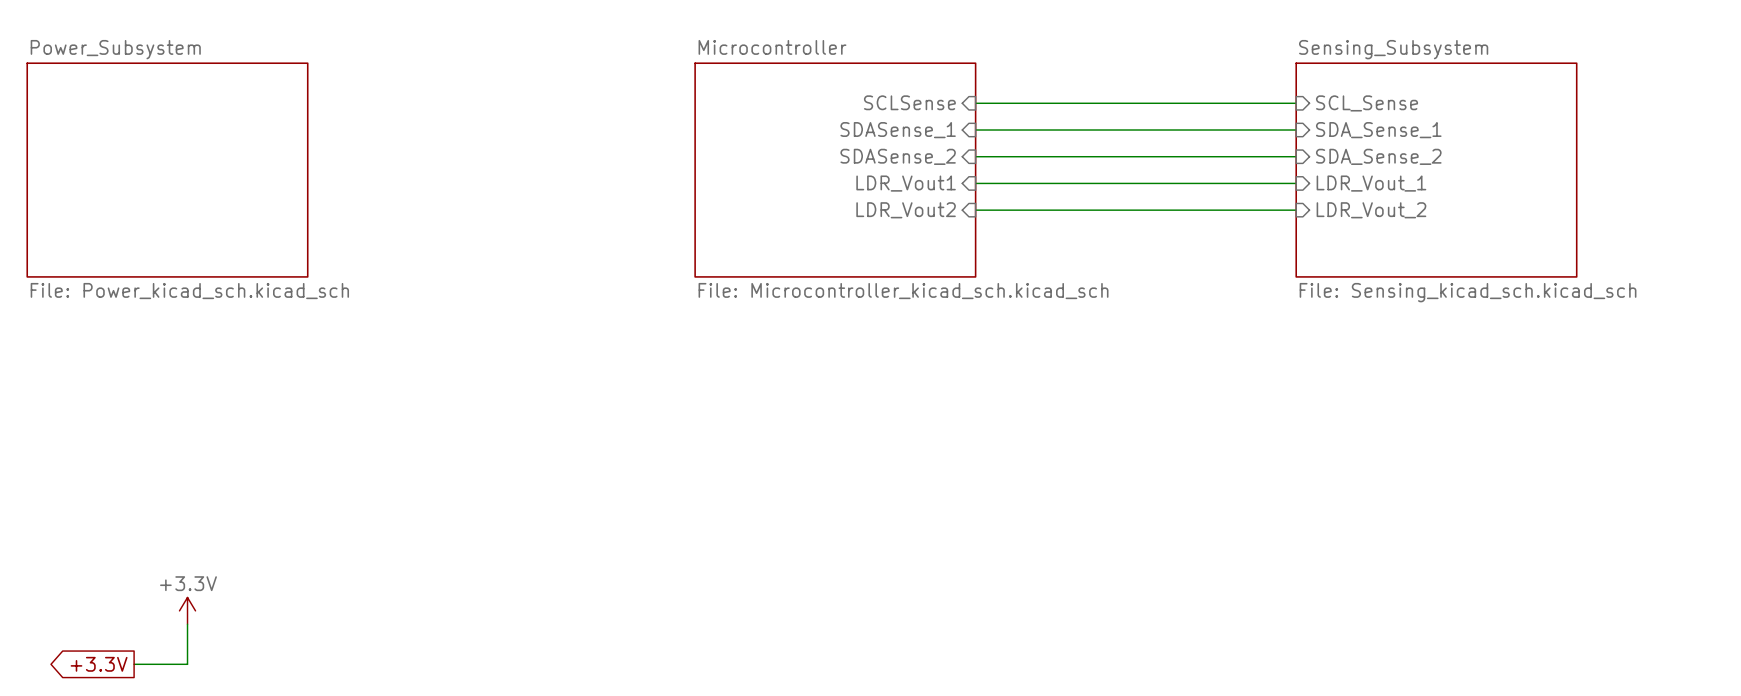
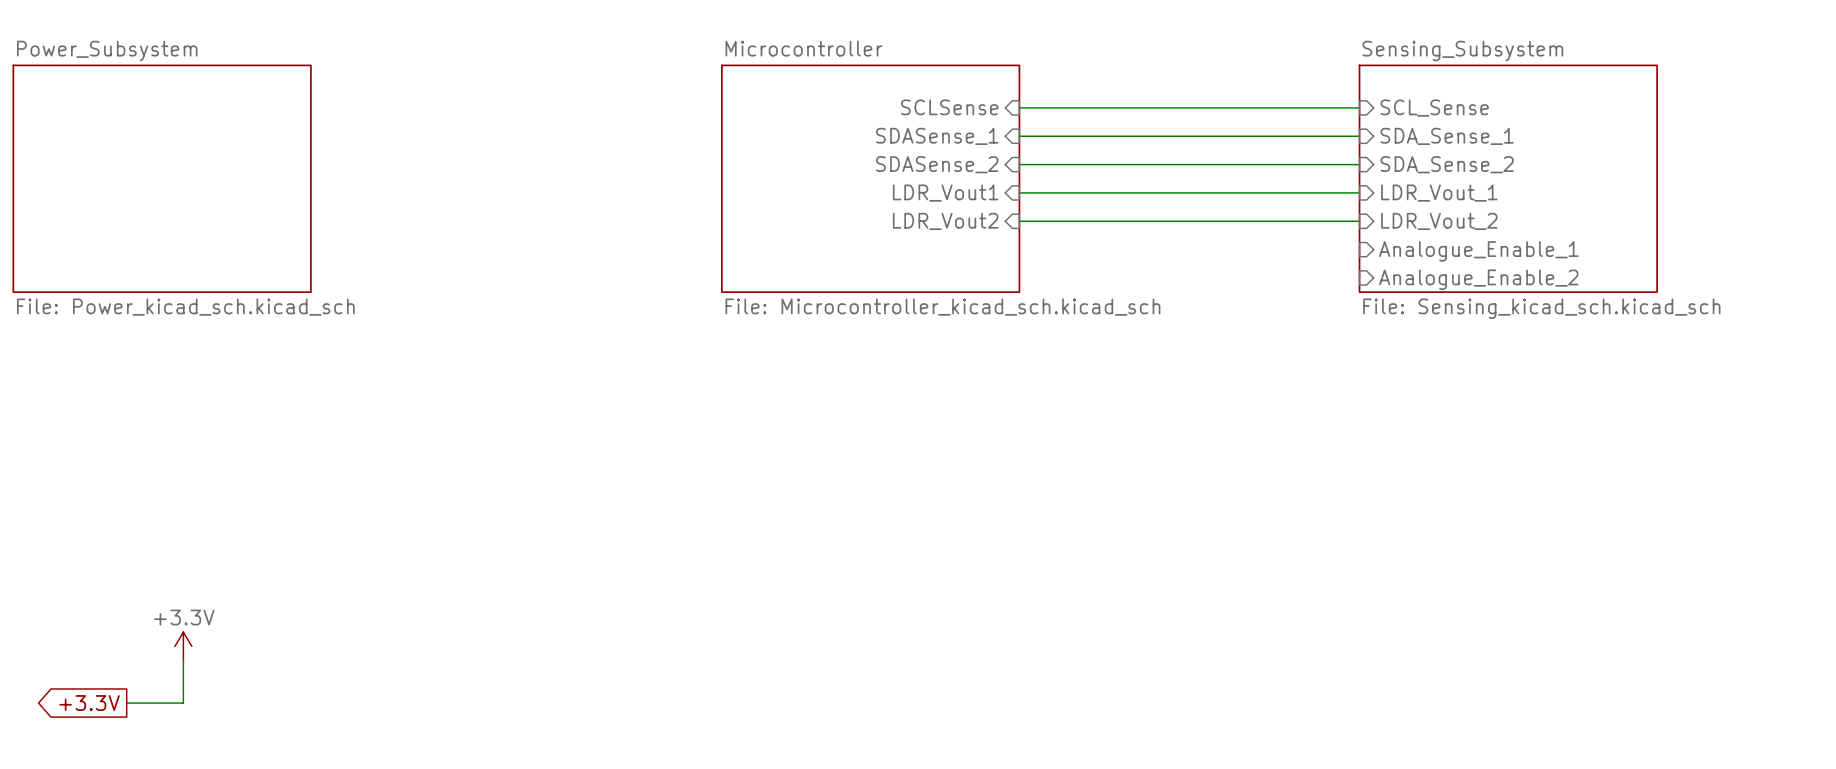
sheet pin: none -> Analogue_Enable_1 (1478, 251)
sheet pin: none -> Analogue_Enable_2 (1478, 279)

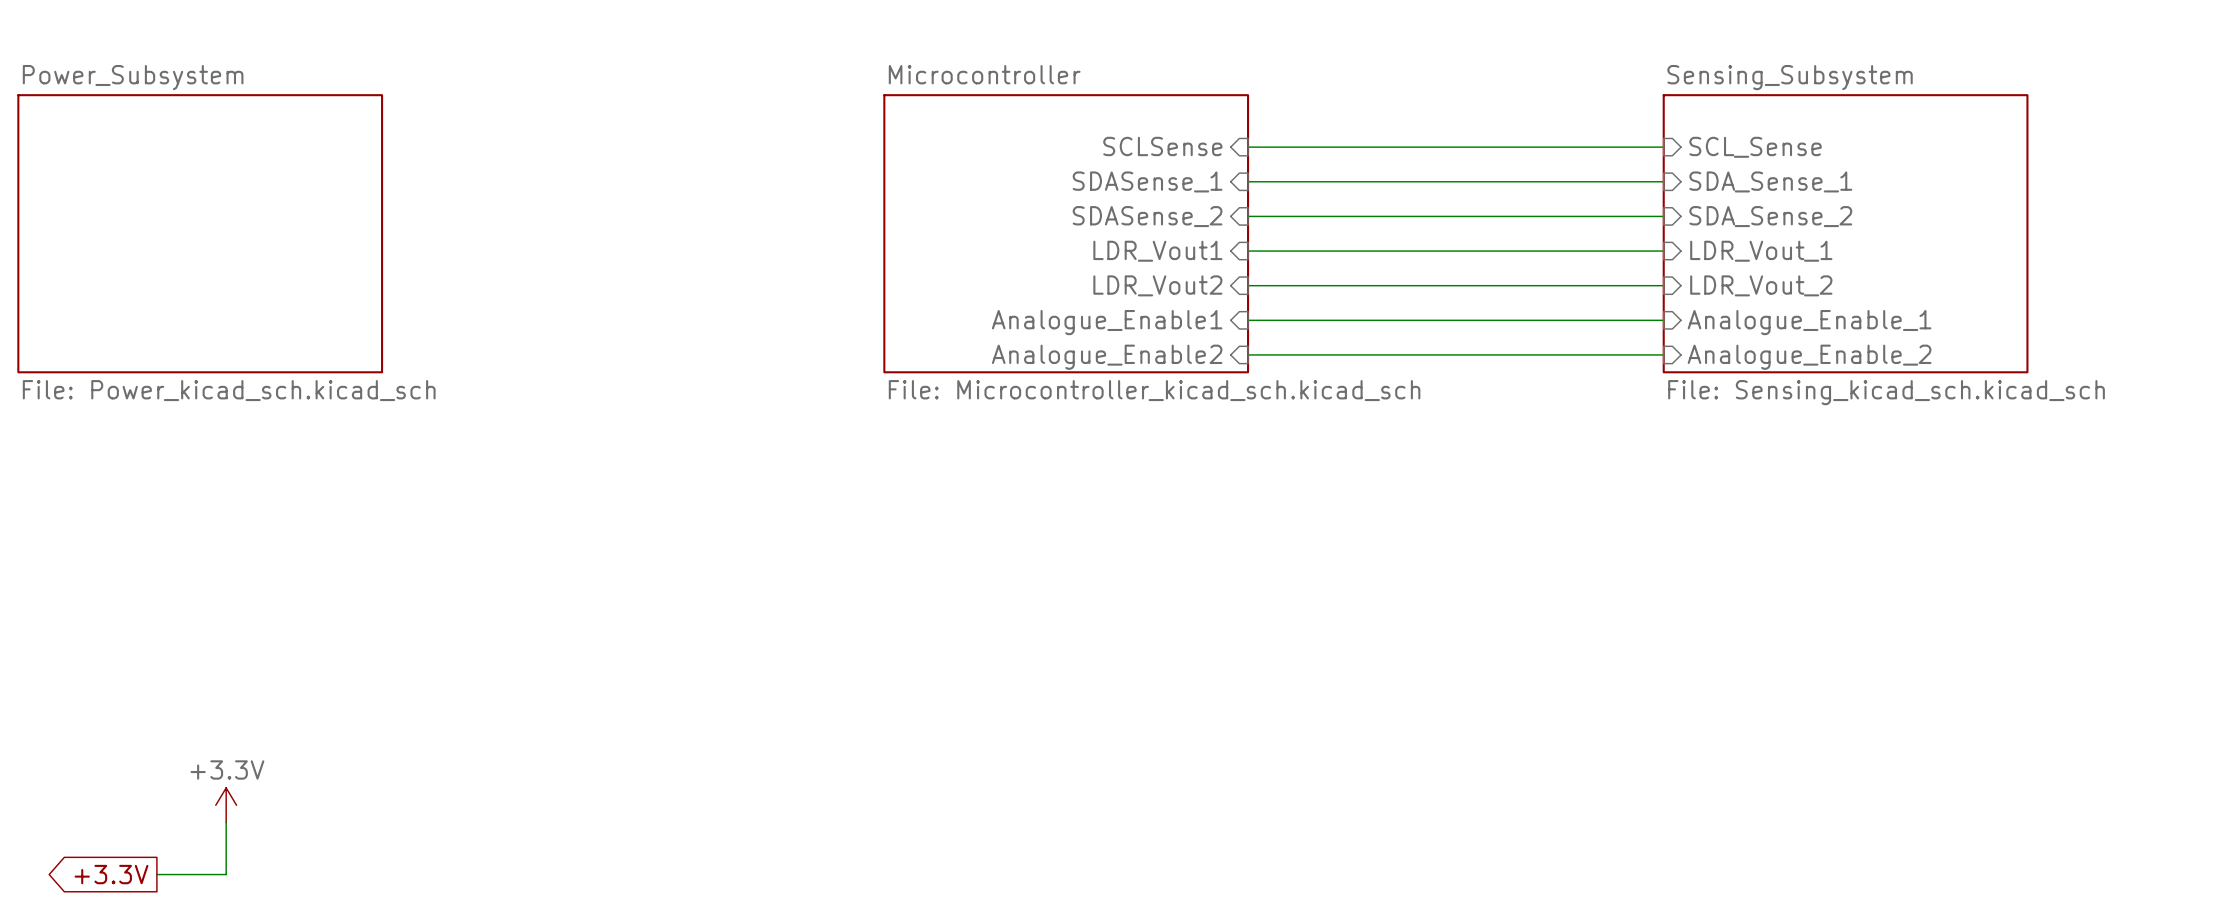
wire: none -> (1248, 320) (1663, 320)
sheet pin: none -> Analogue_Enable1 (1107, 322)
wire: none -> (1248, 354) (1663, 354)
sheet pin: none -> Analogue_Enable2 (1107, 357)

